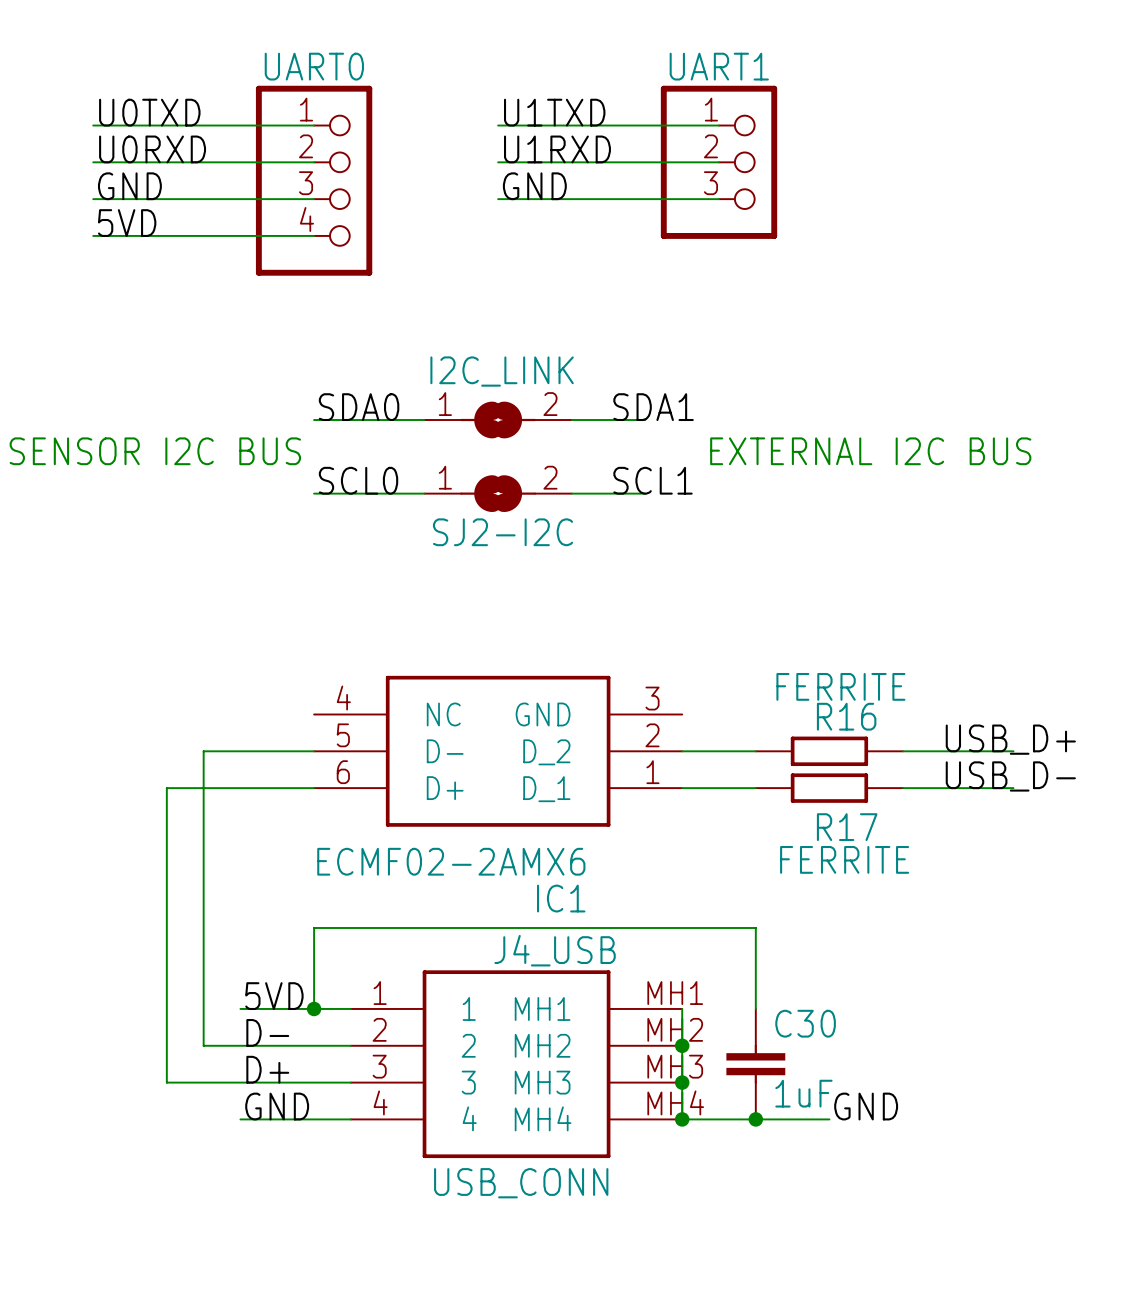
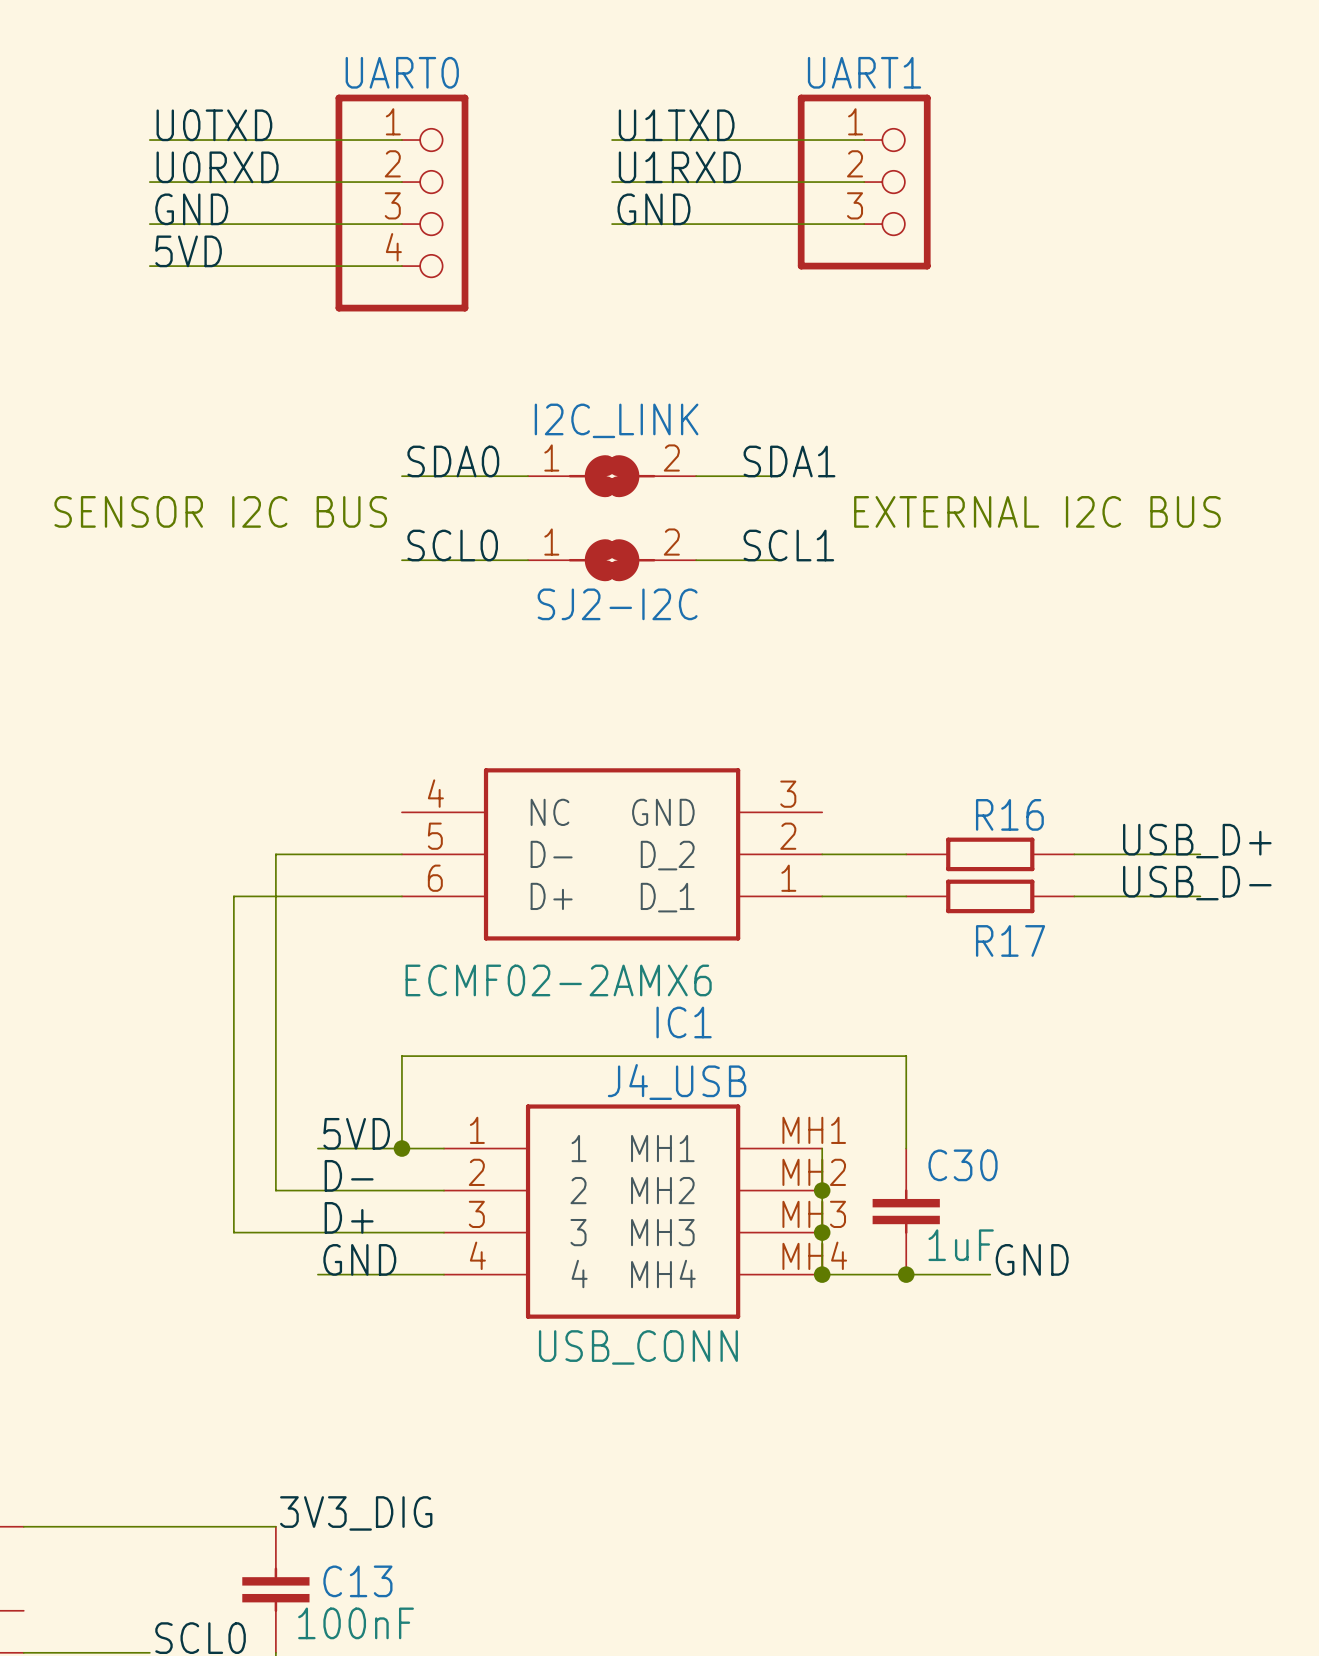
R16 value: FERRITE (840, 686) -> none
R17 value: FERRITE (844, 859) -> none

